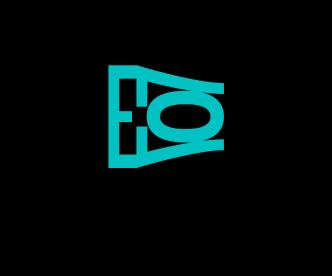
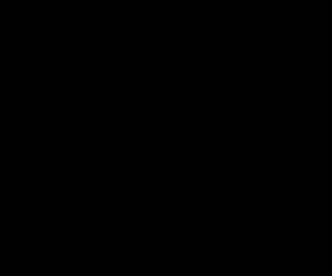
drawing: [108, 65, 224, 169] -> none

